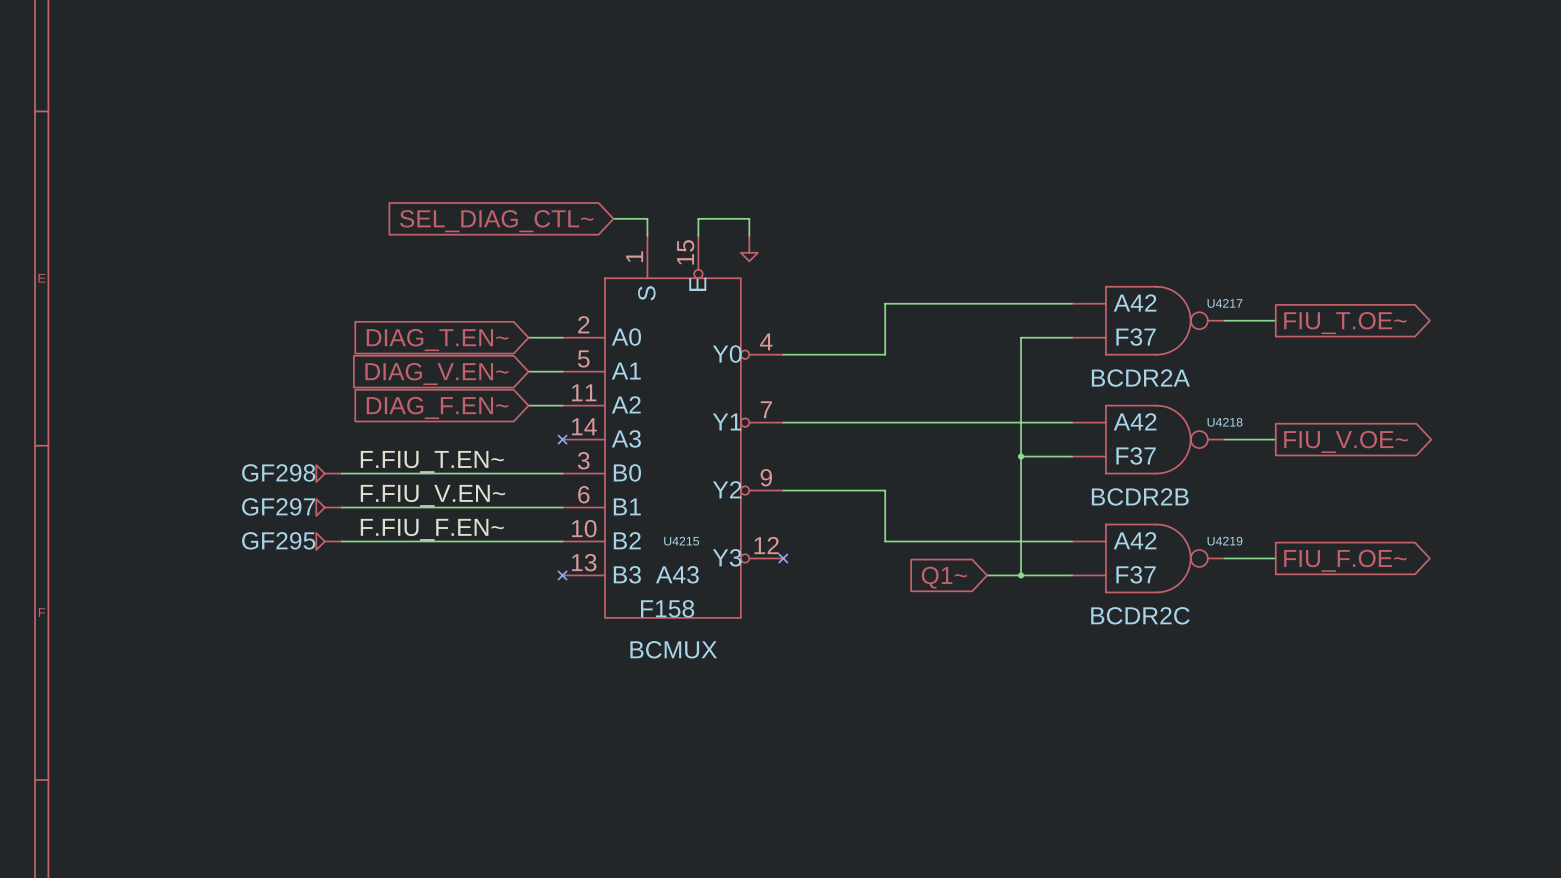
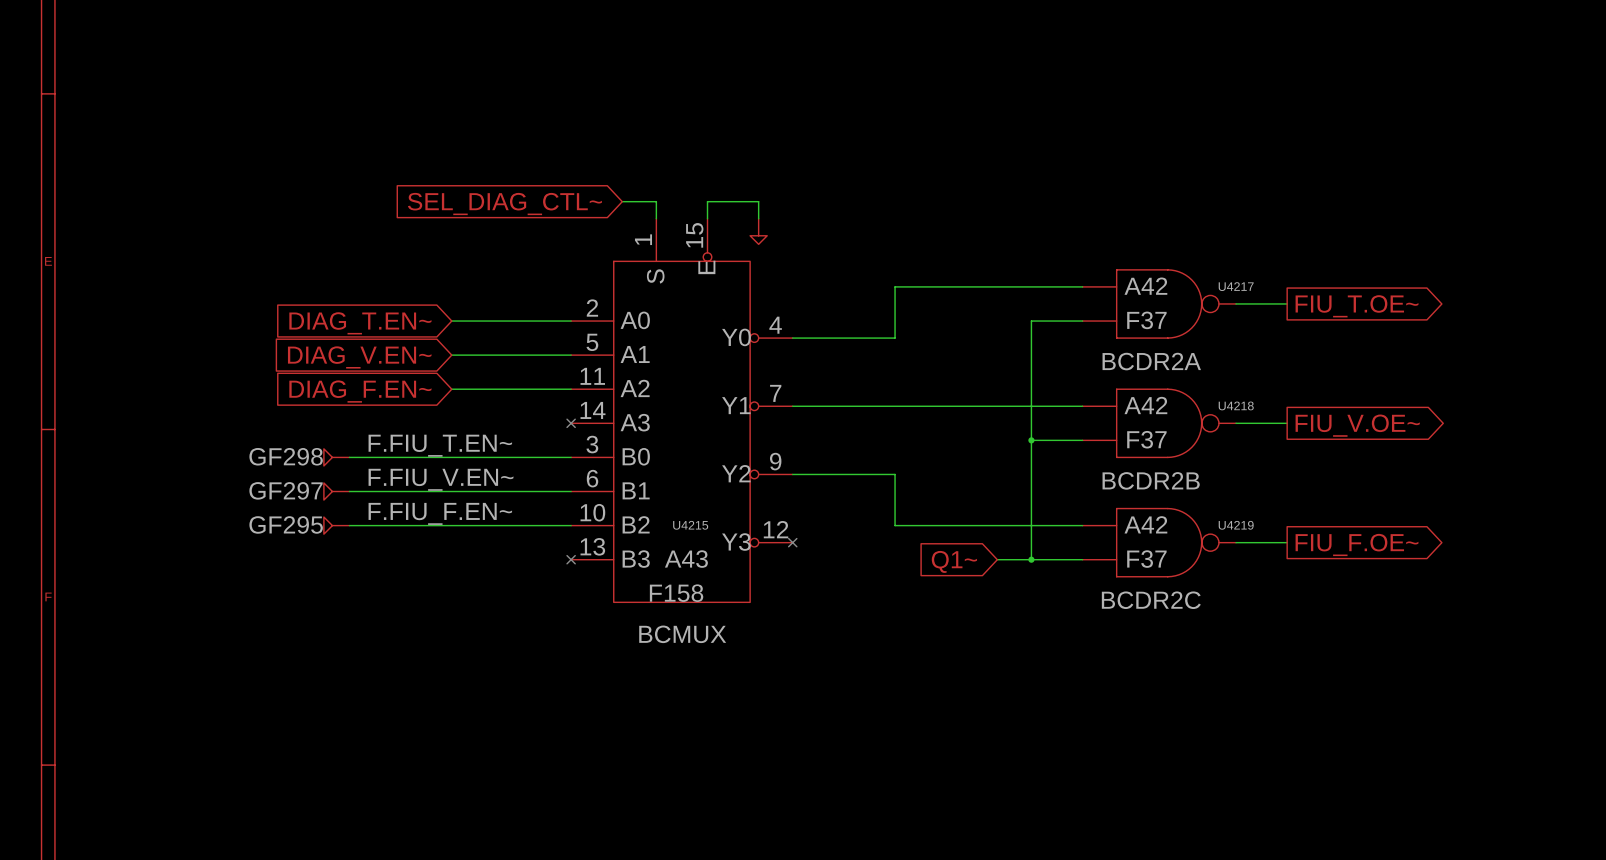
wire: none -> (451, 321) (537, 321)
global label position: DIAG_T.EN~ (437, 340) -> DIAG_T.EN~ (360, 323)
wire: none -> (451, 355) (537, 355)
global label position: DIAG_V.EN~ (436, 373) -> DIAG_V.EN~ (359, 357)
wire: none -> (451, 389) (537, 389)
global label position: DIAG_F.EN~ (437, 407) -> DIAG_F.EN~ (360, 391)

